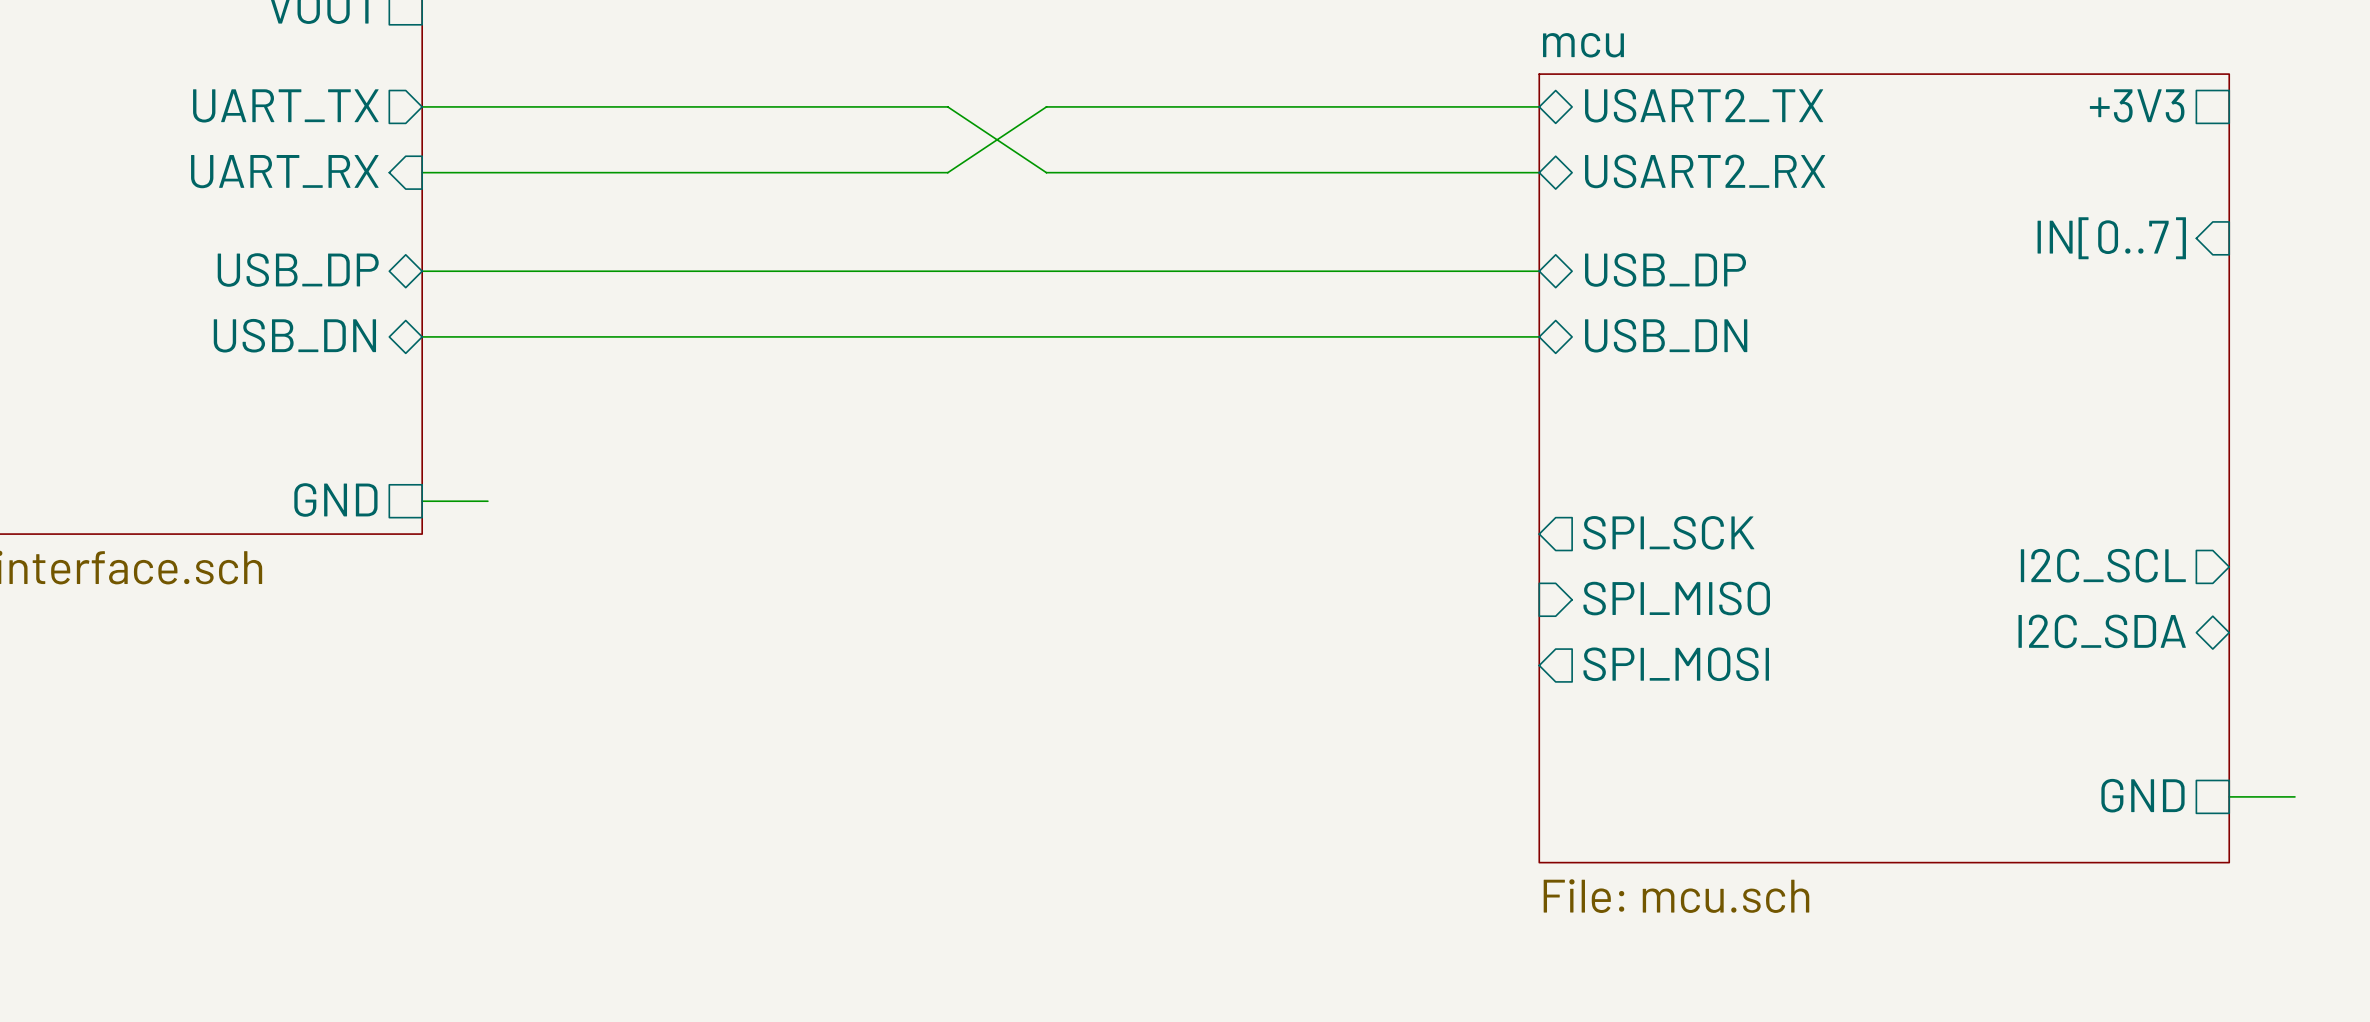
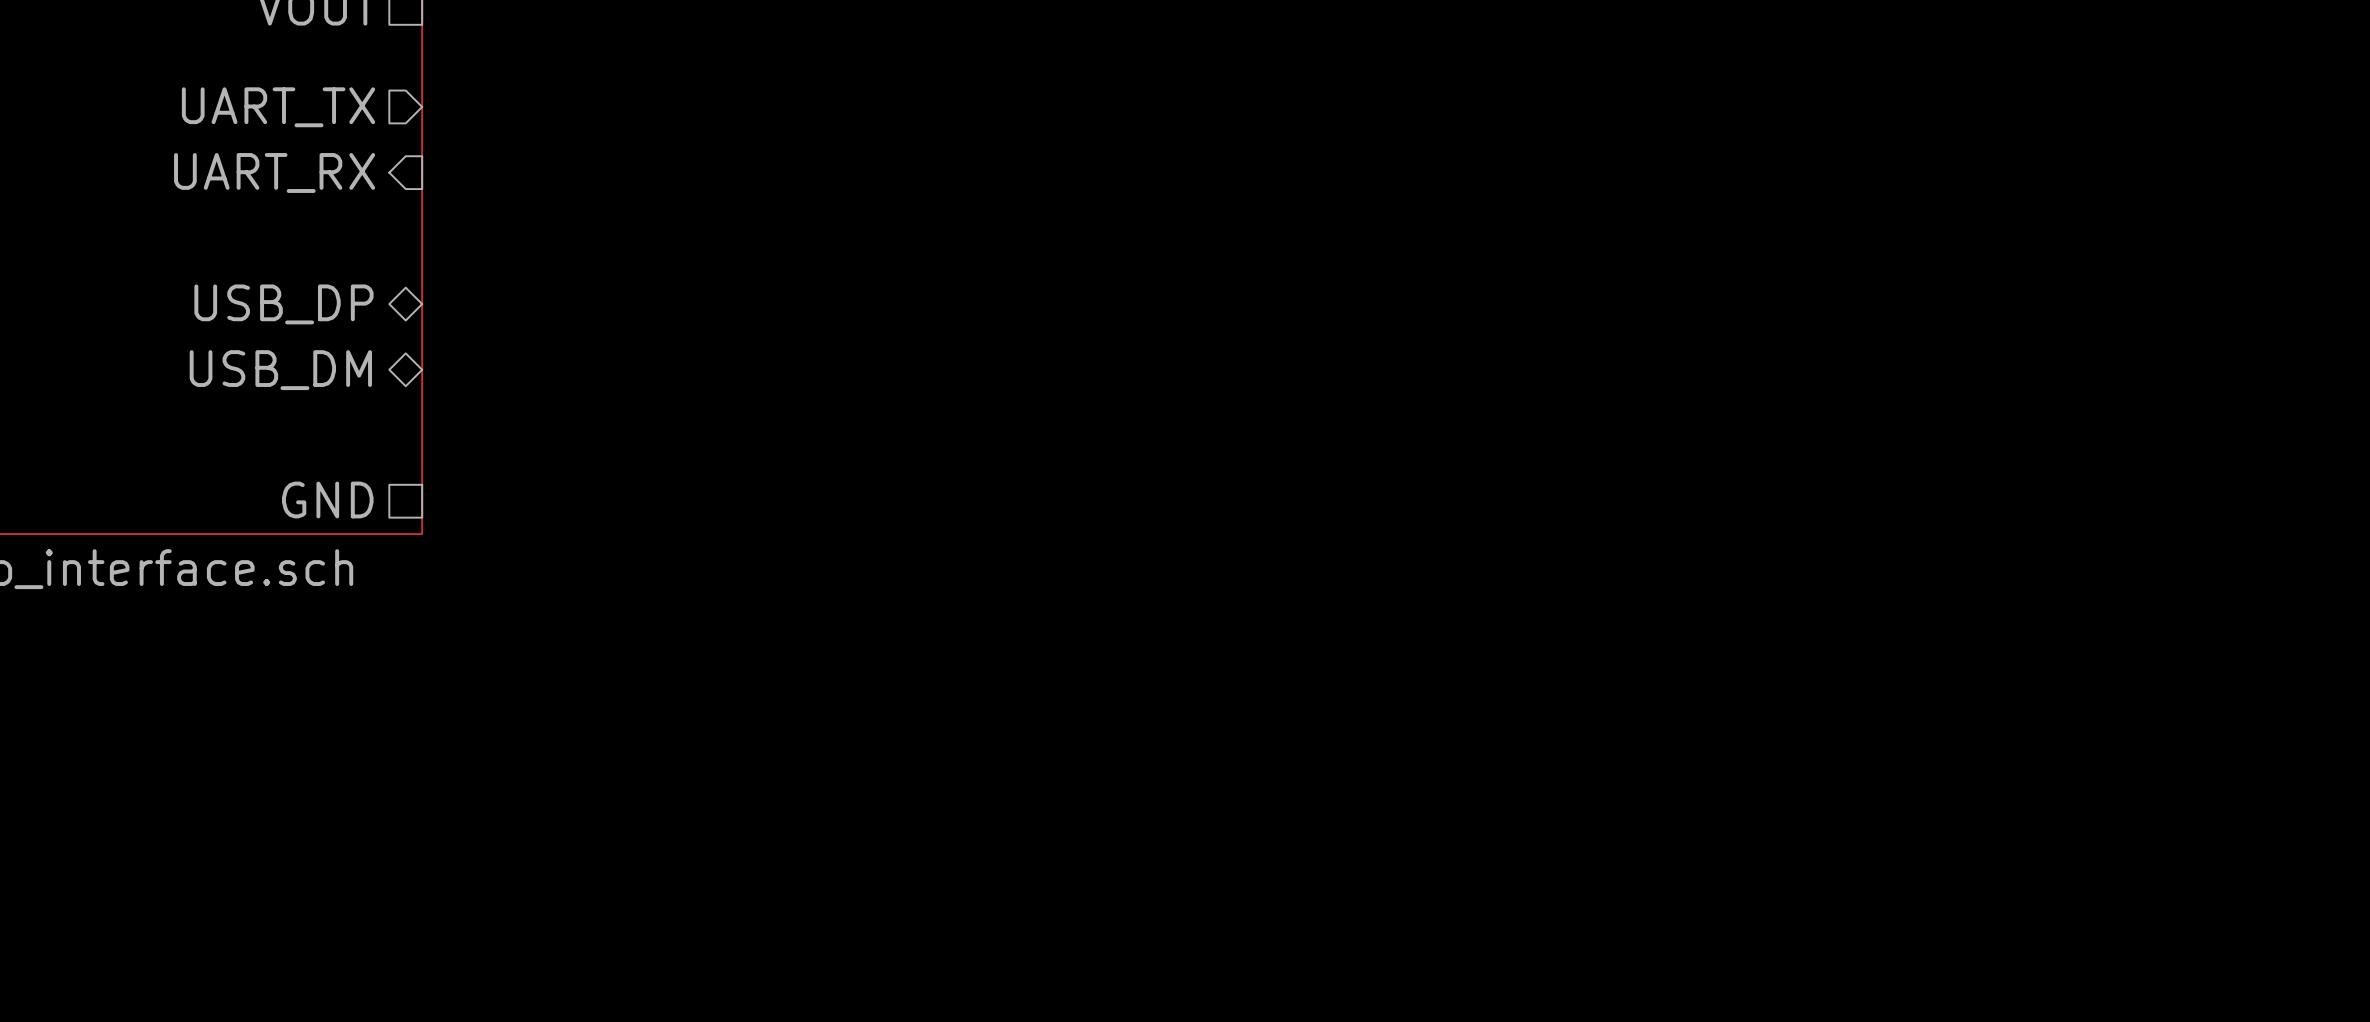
sheet pin: USART2_TX (1704, 105) -> none
sheet pin: +3V3 (2137, 105) -> none
wire: (422, 106) (947, 106) (1046, 172) (1539, 172) -> none
wire: (1539, 106) (1046, 106) (947, 172) (422, 172) -> none
sheet pin: USART2_RX (1705, 171) -> none
sheet pin: IN[0..7] (2111, 238) -> none
sheet pin position: USB_DP (298, 269) -> USB_DP (283, 304)
sheet pin: USB_DP (1665, 269) -> none
wire: (422, 271) (1539, 271) -> none
sheet pin: USB_DN (294, 335) -> USB_DM (280, 370)
sheet pin: USB_DN (1666, 335) -> none
wire: (422, 336) (1539, 336) -> none
sheet mcu: File: mcu.sch (1884, 468) -> none
wire: (422, 501) (487, 501) -> none
sheet pin: SPI_SCK (1668, 532) -> none
sheet pin: I2C_SCL (2103, 565) -> none
sheet pin: SPI_MISO (1676, 598) -> none
sheet pin: I2C_SDA (2102, 631) -> none
sheet pin: SPI_MOSI (1676, 664) -> none
sheet pin: GND (2142, 795) -> none
wire: (2229, 796) (2294, 796) -> none

